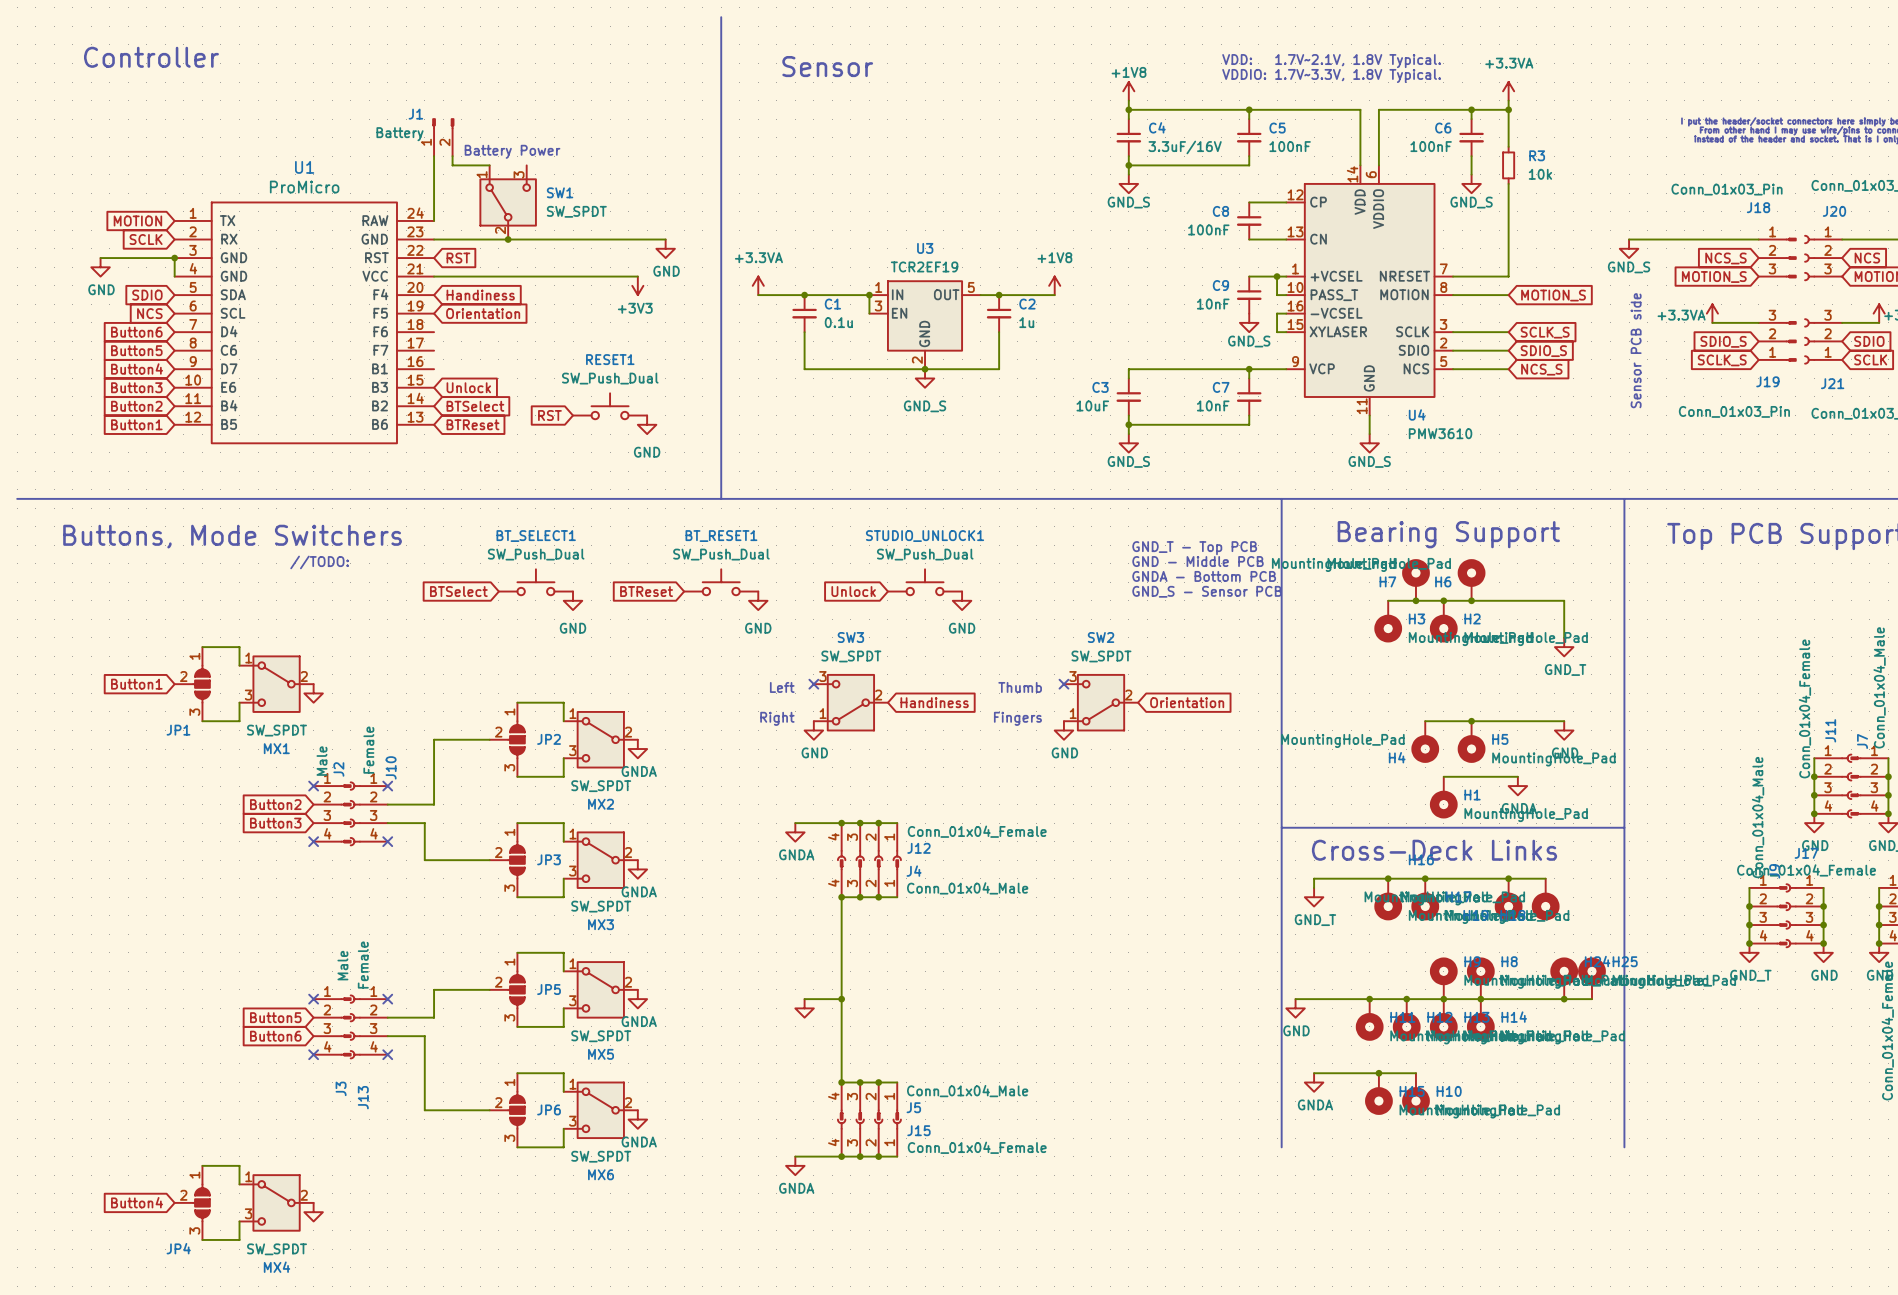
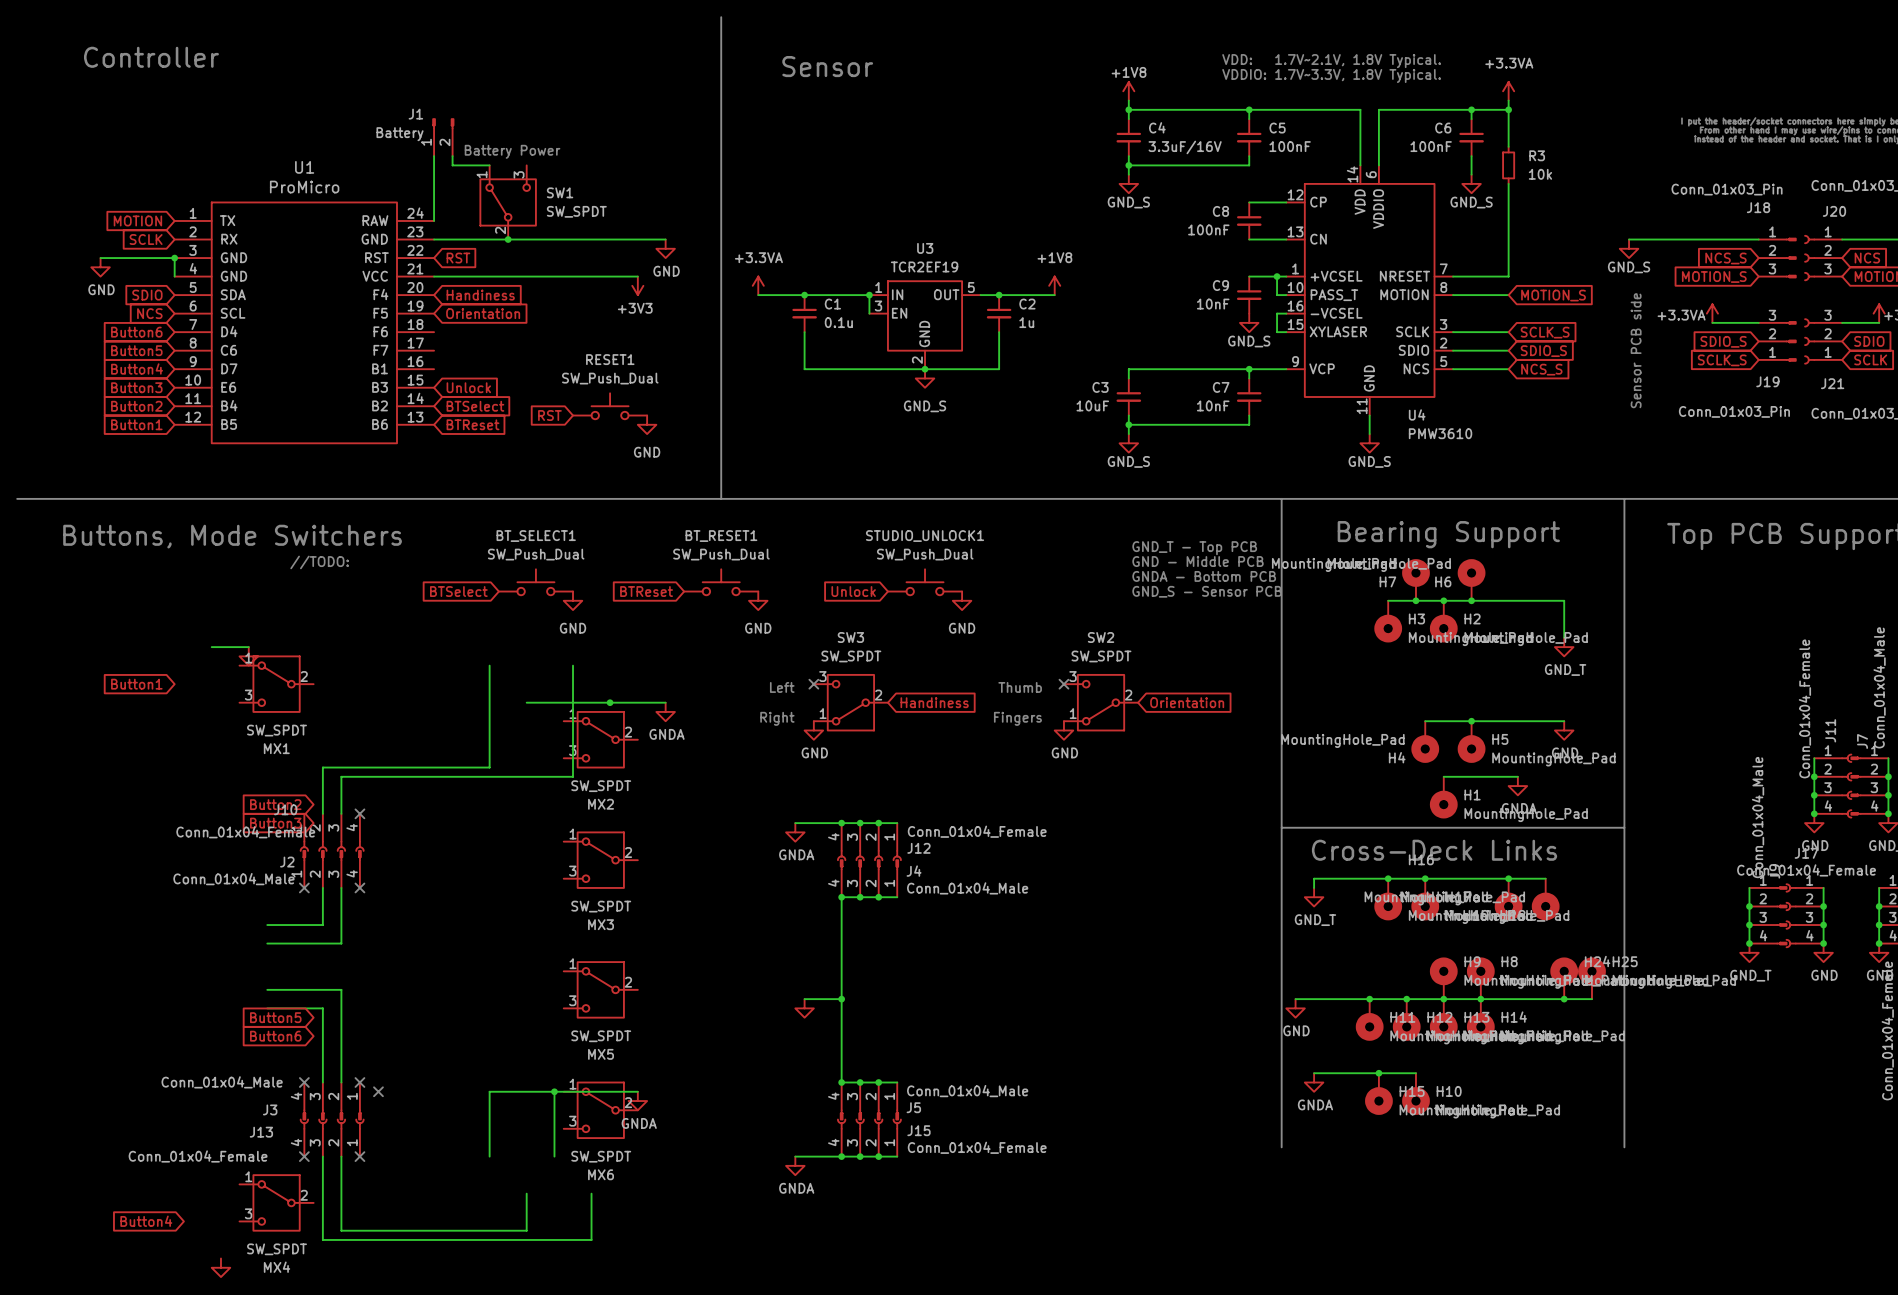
wire: (202, 647) (211, 647) -> none
wire: (239, 647) (239, 665) -> (239, 647) (248, 647)
wire: none -> (489, 665) (489, 767) (322, 767) (322, 813)
JP1: (192, 684) -> none
power symbol position: (313, 693) -> (248, 656)
wire: (239, 702) (239, 721) (202, 721) -> none
wire: (517, 702) (526, 702) -> none
wire: (563, 702) (563, 721) -> (563, 702) (665, 702)
junction: none -> (610, 702)
wire: (489, 739) (434, 739) (434, 804) (387, 804) -> none
JP2: (507, 739) -> none
power symbol position: GNDA (637, 749) -> GNDA (665, 711)
J10 value: Female (368, 750) -> Conn_01x04_Female (245, 832)
wire: (563, 758) (563, 776) -> (573, 665) (573, 776) (563, 776)
J2 value: Male (321, 761) -> Conn_01x04_Male (233, 879)
wire: none -> (517, 776) (341, 776) (341, 813)
no-connect mark: (313, 786) -> none
no-connect mark: (387, 786) -> none
J2 position: (332, 813) -> (332, 869)
J2 rotation: 0° (346, 813) -> 90° counterclockwise (332, 855)
J10 rotation: 0° (355, 813) -> 90° counterclockwise (332, 846)
no-connect mark: none -> (359, 813)
J10 position: (368, 813) -> (332, 832)
wire: (387, 823) (424, 823) (424, 860) (489, 860) -> none
wire: (517, 823) (563, 823) (563, 841) -> none
no-connect mark: (313, 841) -> none
no-connect mark: (387, 841) -> none
JP3: (507, 860) -> none
power symbol: GNDA (637, 869) -> none
wire: (563, 878) (563, 897) (517, 897) -> none
no-connect mark: none -> (304, 887)
wire: none -> (322, 887) (322, 925) (267, 925)
wire: none -> (341, 887) (341, 943) (267, 943)
no-connect mark: none -> (359, 887)
wire: (517, 952) (563, 952) (563, 971) -> none
J3 value: Male (342, 965) -> Conn_01x04_Male (222, 1082)
J13 value: Female (363, 965) -> Conn_01x04_Female (198, 1156)
wire: none -> (267, 989) (341, 989) (341, 1082)
wire: (489, 989) (434, 989) (434, 1017) (387, 1017) -> none
JP5: (507, 989) -> none
no-connect mark: (313, 999) -> none
no-connect mark: (387, 999) -> none
power symbol: GNDA (637, 999) -> none
wire: none -> (267, 1008) (322, 1008) (322, 1082)
wire: (563, 1008) (563, 1026) (517, 1026) -> none
J3 position: (332, 1026) -> (332, 1101)
J3 rotation: 0° (346, 1026) -> 90° clockwise (332, 1114)
J13 rotation: 0° (355, 1026) -> 90° clockwise (332, 1124)
J13 position: (368, 1026) -> (332, 1137)
wire: (387, 1036) (424, 1036) (424, 1110) (489, 1110) -> none
no-connect mark: (313, 1054) -> none
no-connect mark: (387, 1054) -> none
wire: (517, 1073) (563, 1073) (563, 1091) -> none
no-connect mark: none -> (304, 1082)
no-connect mark: none -> (359, 1082)
no-connect mark: none -> (378, 1091)
wire: none -> (554, 1091) (554, 1156)
junction: none -> (554, 1091)
wire: none -> (637, 1091) (489, 1091) (489, 1156)
JP6: (507, 1110) -> none
power symbol position: GNDA (637, 1119) -> GNDA (637, 1101)
wire: (563, 1128) (563, 1147) (517, 1147) -> none
no-connect mark: none -> (304, 1156)
wire: none -> (322, 1156) (322, 1239) (591, 1239) (591, 1193)
wire: none -> (341, 1156) (341, 1230) (526, 1230) (526, 1193)
no-connect mark: none -> (359, 1156)
wire: (202, 1165) (239, 1165) (239, 1184) -> none
global label position: Button4 (137, 1202) -> Button4 (146, 1221)
JP4: (192, 1202) -> none
power symbol position: (313, 1212) -> (220, 1267)
wire: (239, 1221) (239, 1239) (202, 1239) -> none

